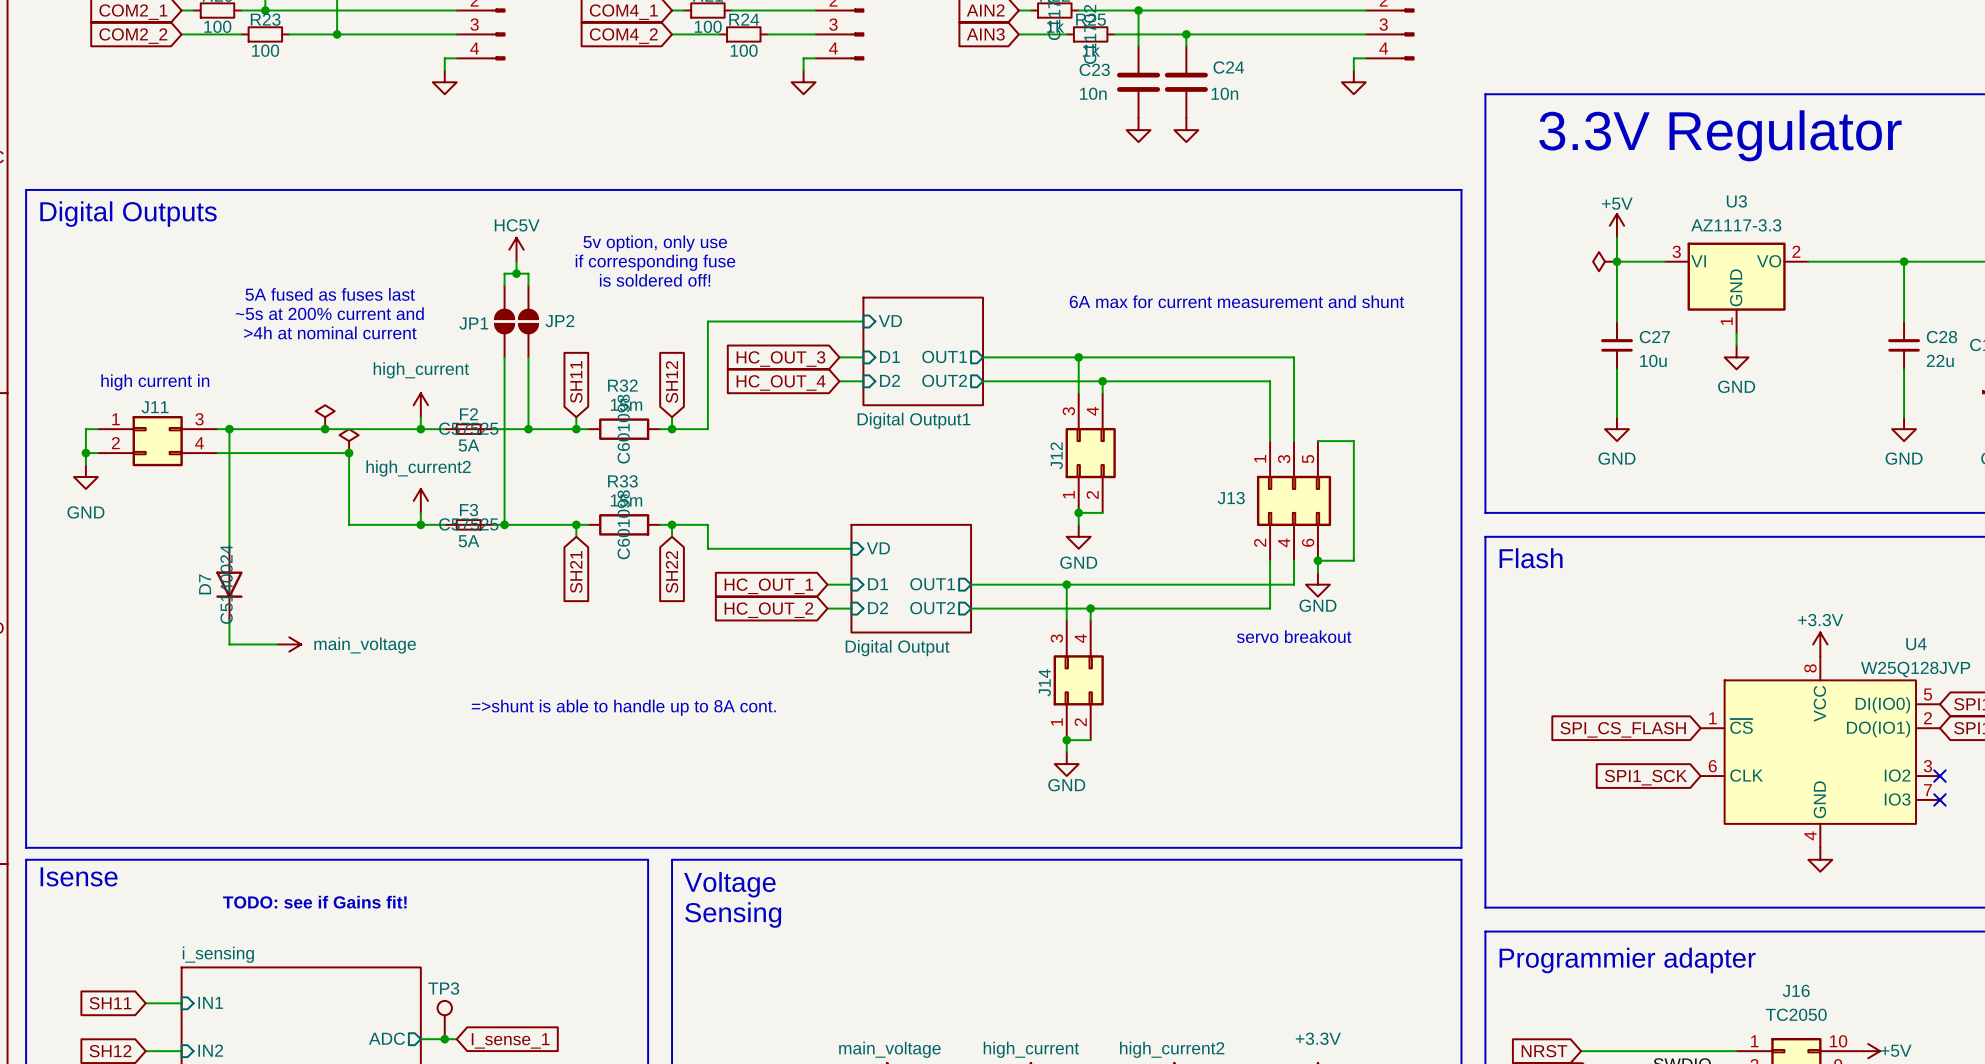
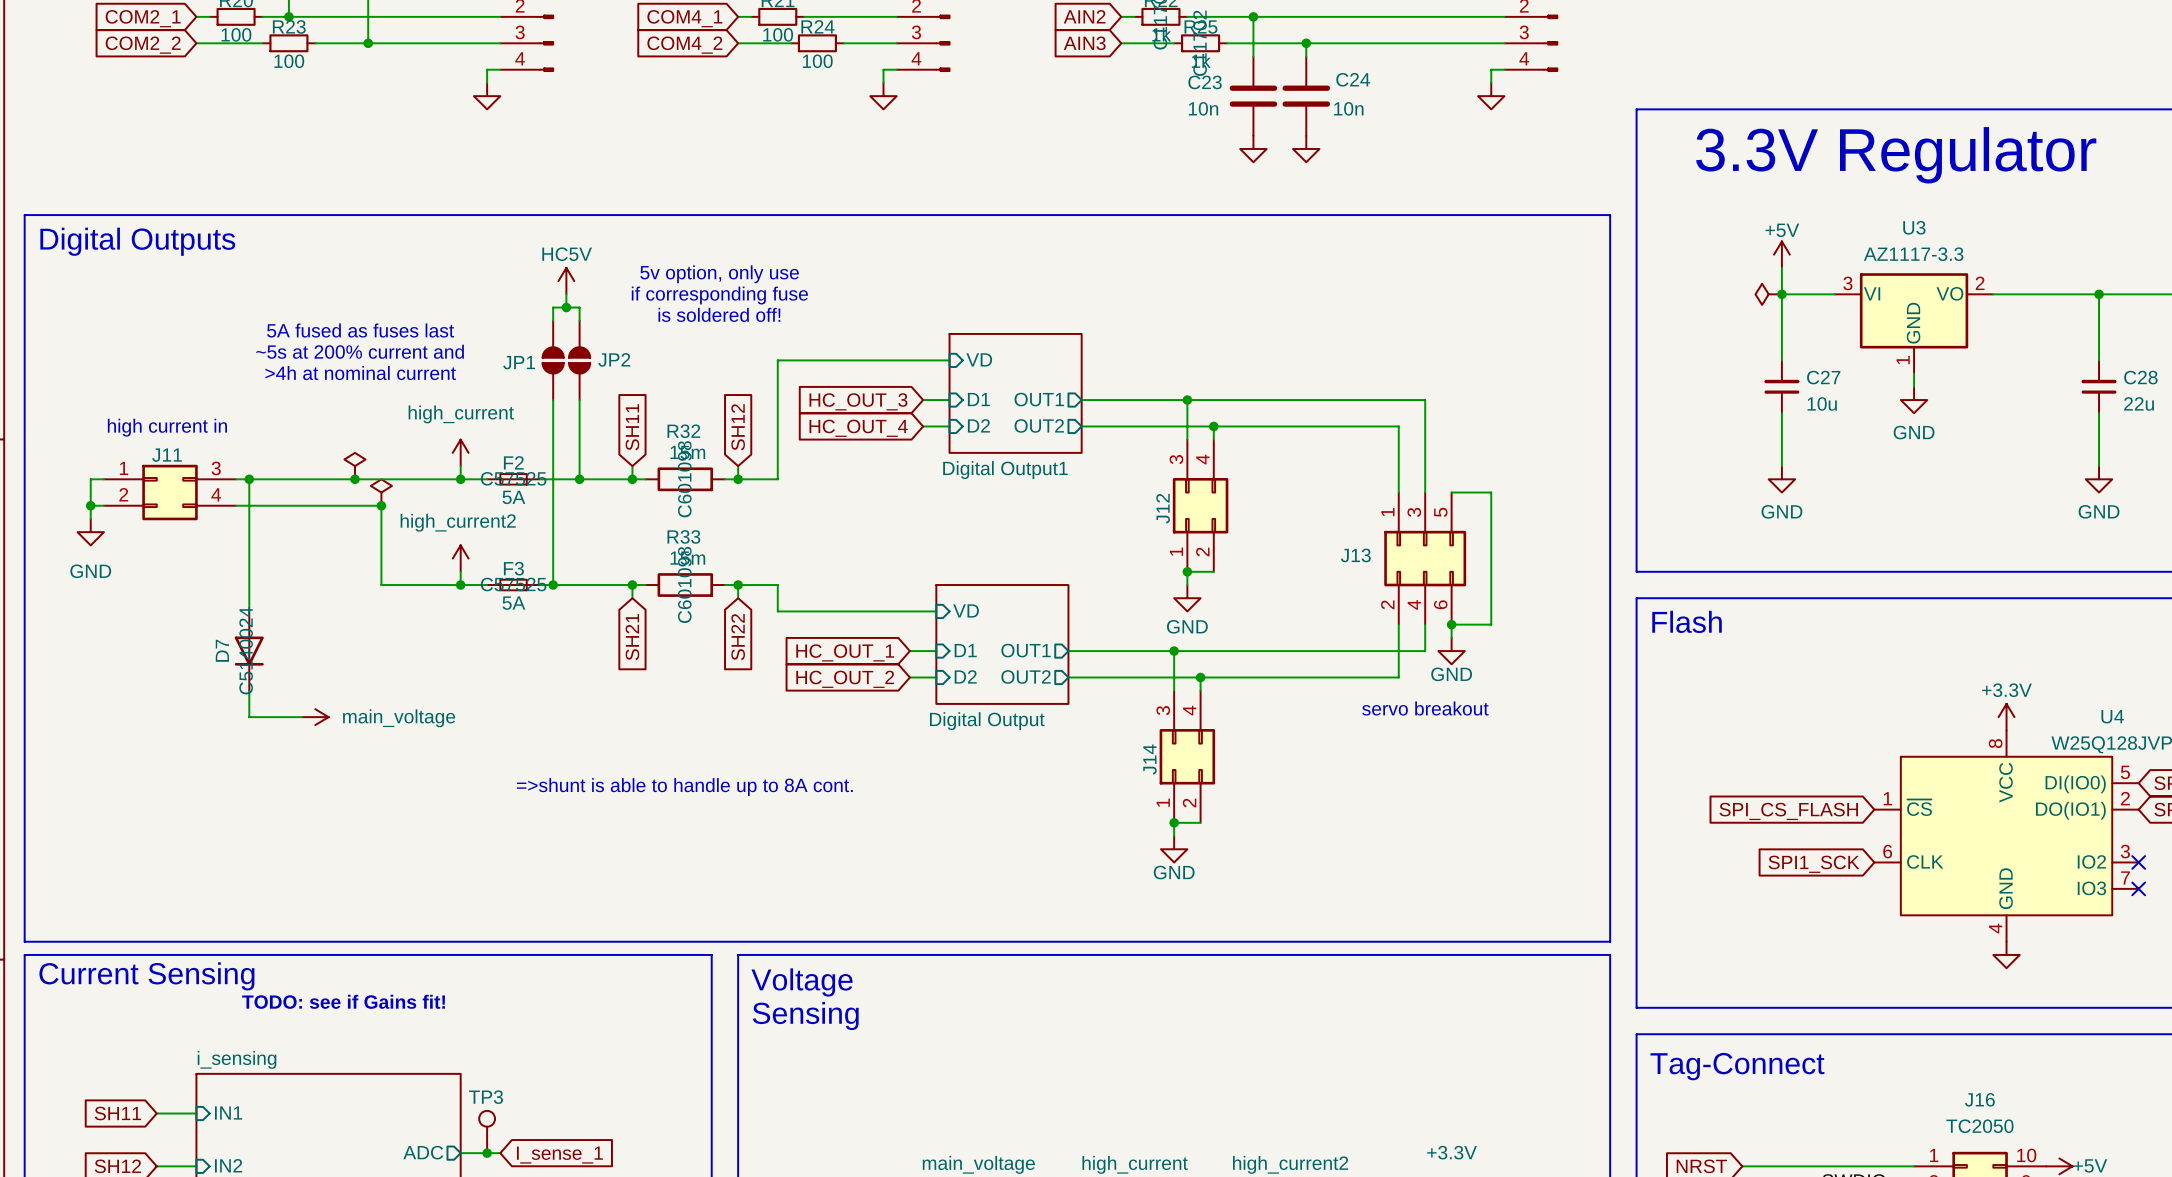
text: 6A max for current measurement and shunt (1236, 301) -> none
text: Isense (79, 876) -> Current Sensing (146, 976)
text: Programmier adapter (1627, 960) -> Tag-Connect (1737, 1066)

